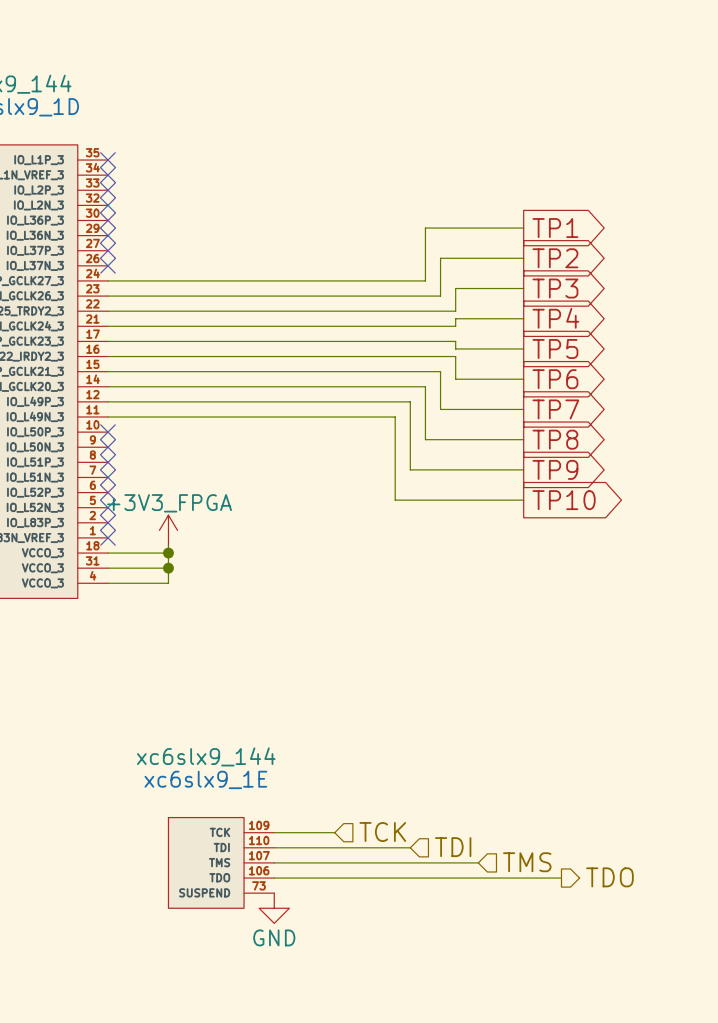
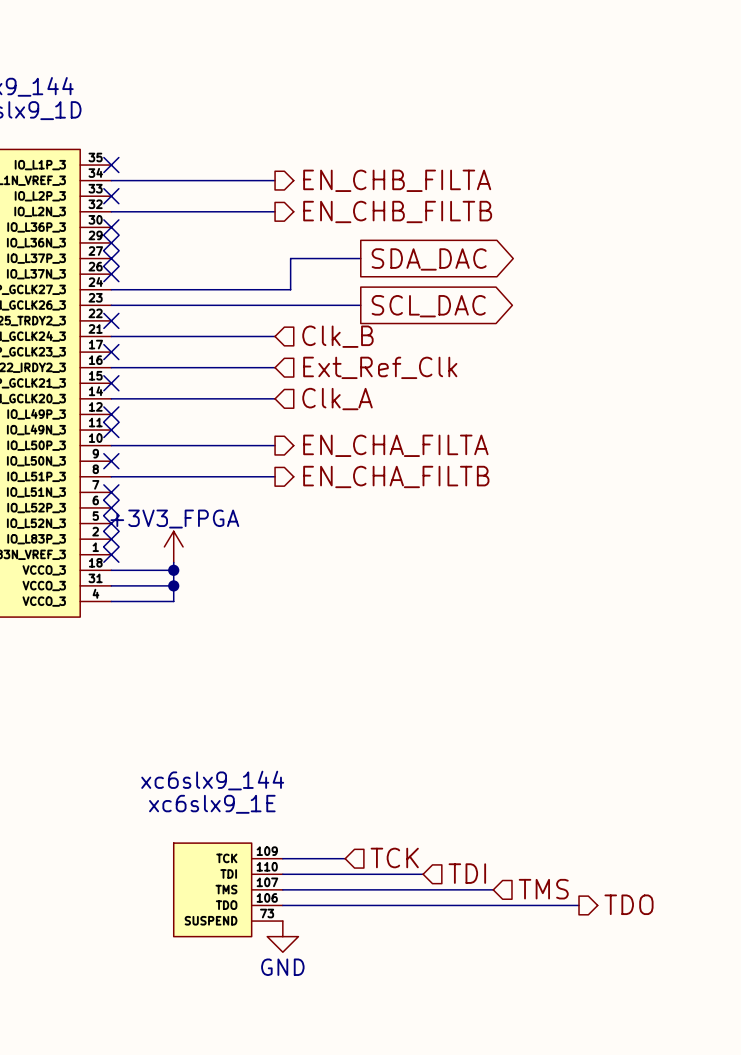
wire: none -> (111, 180) (275, 180)
no-connect mark: (108, 175) -> none
hierarchical label: none -> EN_CHB_FILTA (397, 180)
wire: none -> (111, 211) (275, 211)
no-connect mark: (108, 205) -> none
hierarchical label: none -> EN_CHB_FILTB (397, 211)
wire: (523, 228) (425, 228) (425, 280) (281, 280) -> (360, 258) (290, 258) (290, 289)
global label: TP1 (555, 228) -> none
global label: none -> SDA_DAC (429, 259)
wire: (523, 258) (440, 258) (440, 296) (349, 296) -> none
global label: TP2 (555, 258) -> none
wire: (523, 288) (455, 288) (455, 311) (108, 311) -> none
global label: TP3 (555, 288) -> none
global label: none -> SCL_DAC (428, 306)
no-connect mark: none -> (111, 320)
wire: (523, 318) (455, 318) (455, 326) (266, 326) -> none
global label: TP4 (555, 318) -> none
hierarchical label: none -> Clk_B (337, 336)
wire: (108, 341) (455, 341) (455, 348) (523, 348) -> none
no-connect mark: none -> (111, 352)
global label: TP5 (555, 348) -> none
wire: (266, 356) (455, 356) (455, 379) (523, 379) -> none
hierarchical label: none -> Ext_Ref_Clk (380, 367)
wire: (108, 371) (440, 371) (440, 409) (523, 409) -> none
no-connect mark: none -> (111, 383)
global label: TP6 (555, 379) -> none
wire: (266, 386) (425, 386) (425, 439) (523, 439) -> none
hierarchical label: none -> Clk_A (337, 399)
wire: (108, 401) (410, 401) (410, 469) (523, 469) -> none
no-connect mark: none -> (111, 414)
global label: TP7 (555, 409) -> none
wire: (108, 417) (395, 417) (395, 500) (523, 500) -> none
no-connect mark: none -> (111, 430)
wire: none -> (111, 445) (275, 445)
no-connect mark: (108, 432) -> none
hierarchical label: none -> EN_CHA_FILTA (395, 445)
global label: TP8 (555, 439) -> none
wire: none -> (111, 476) (275, 476)
no-connect mark: (108, 462) -> none
hierarchical label: none -> EN_CHA_FILTB (396, 476)
global label: TP9 (555, 469) -> none
global label: TP10 (564, 500) -> none

